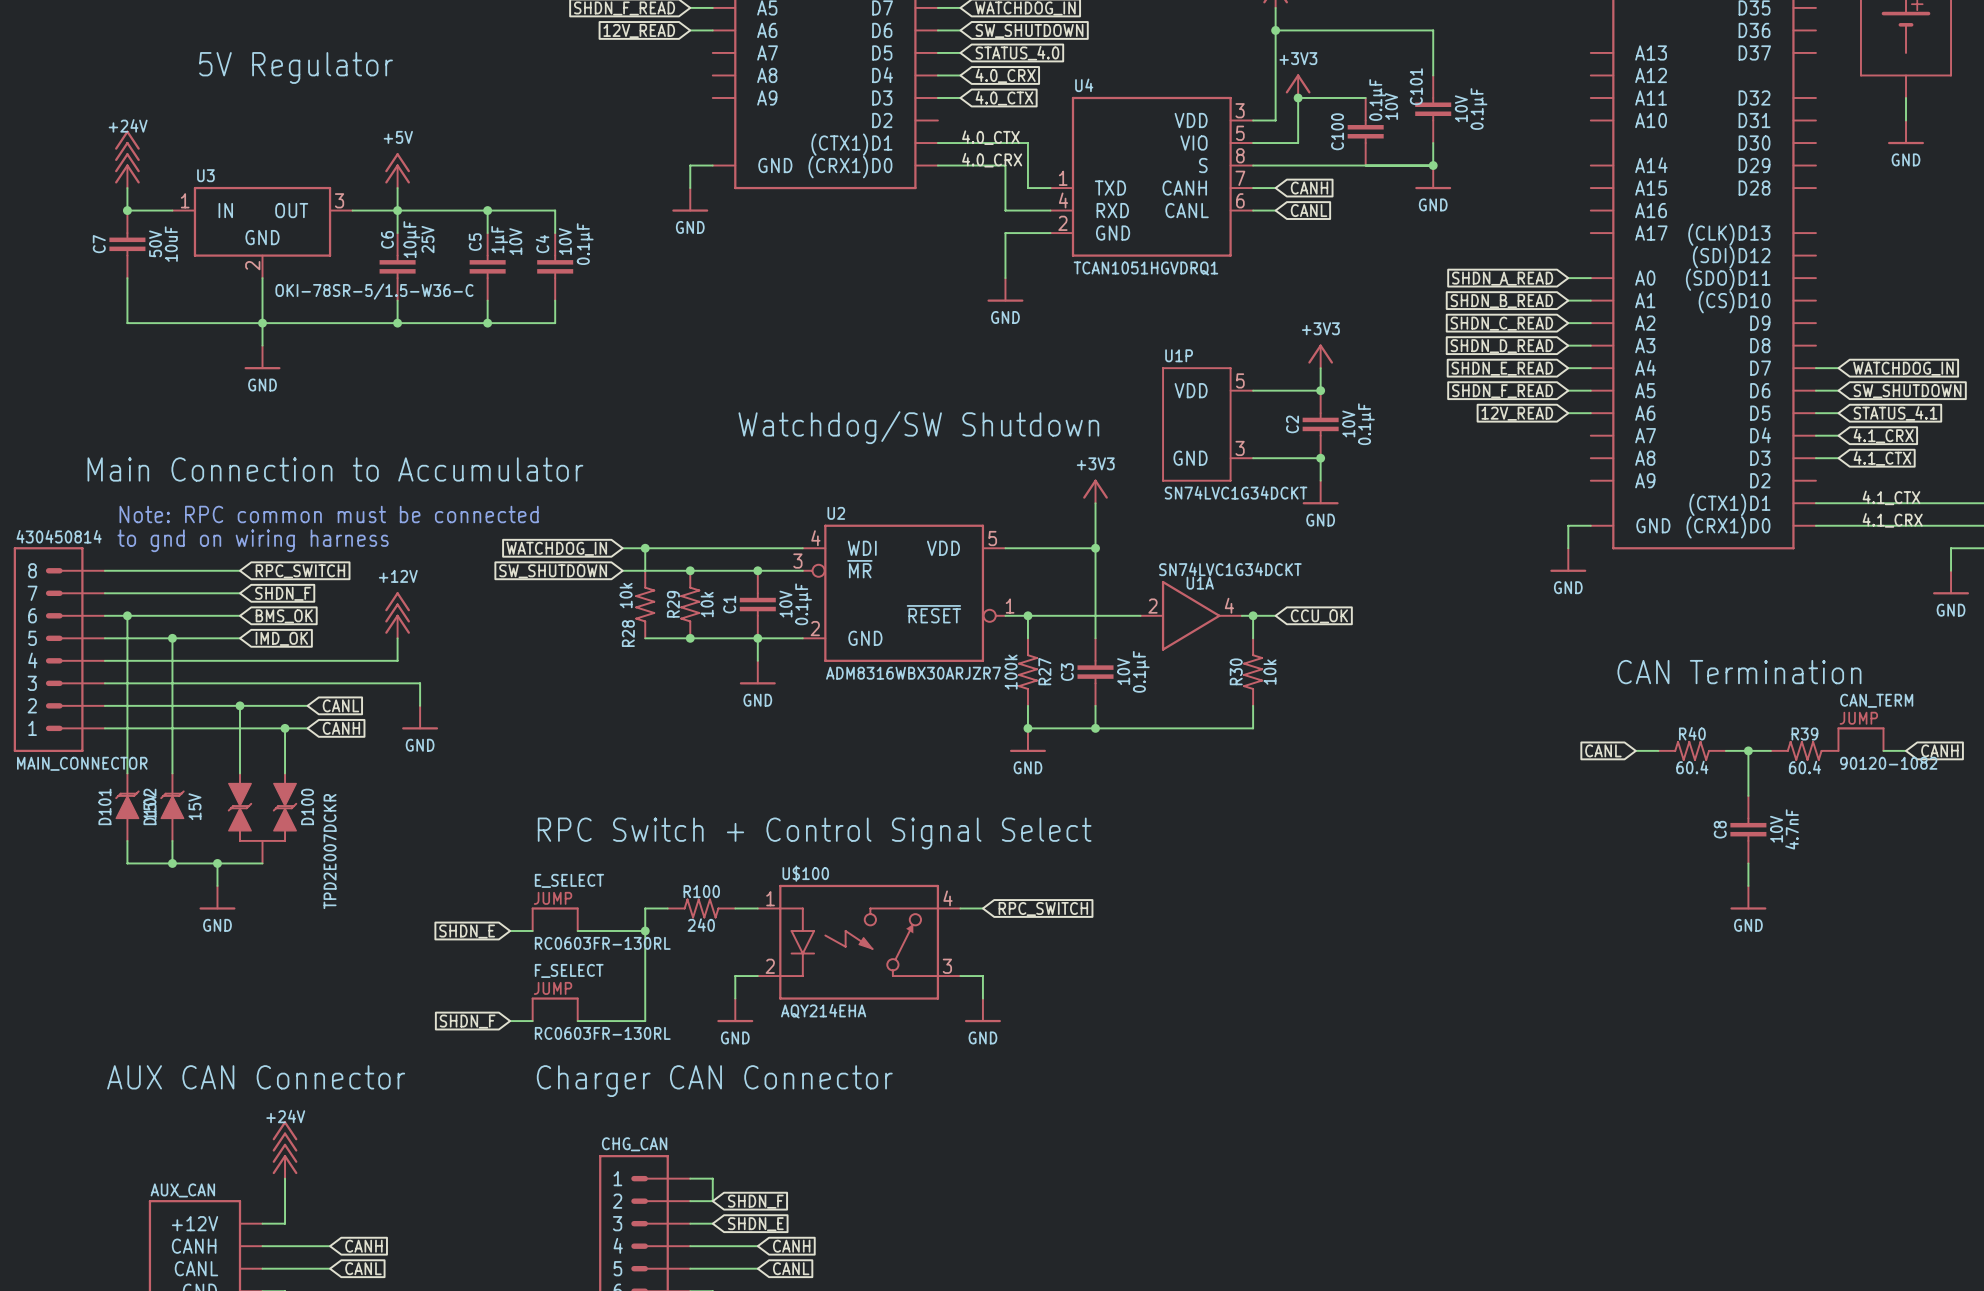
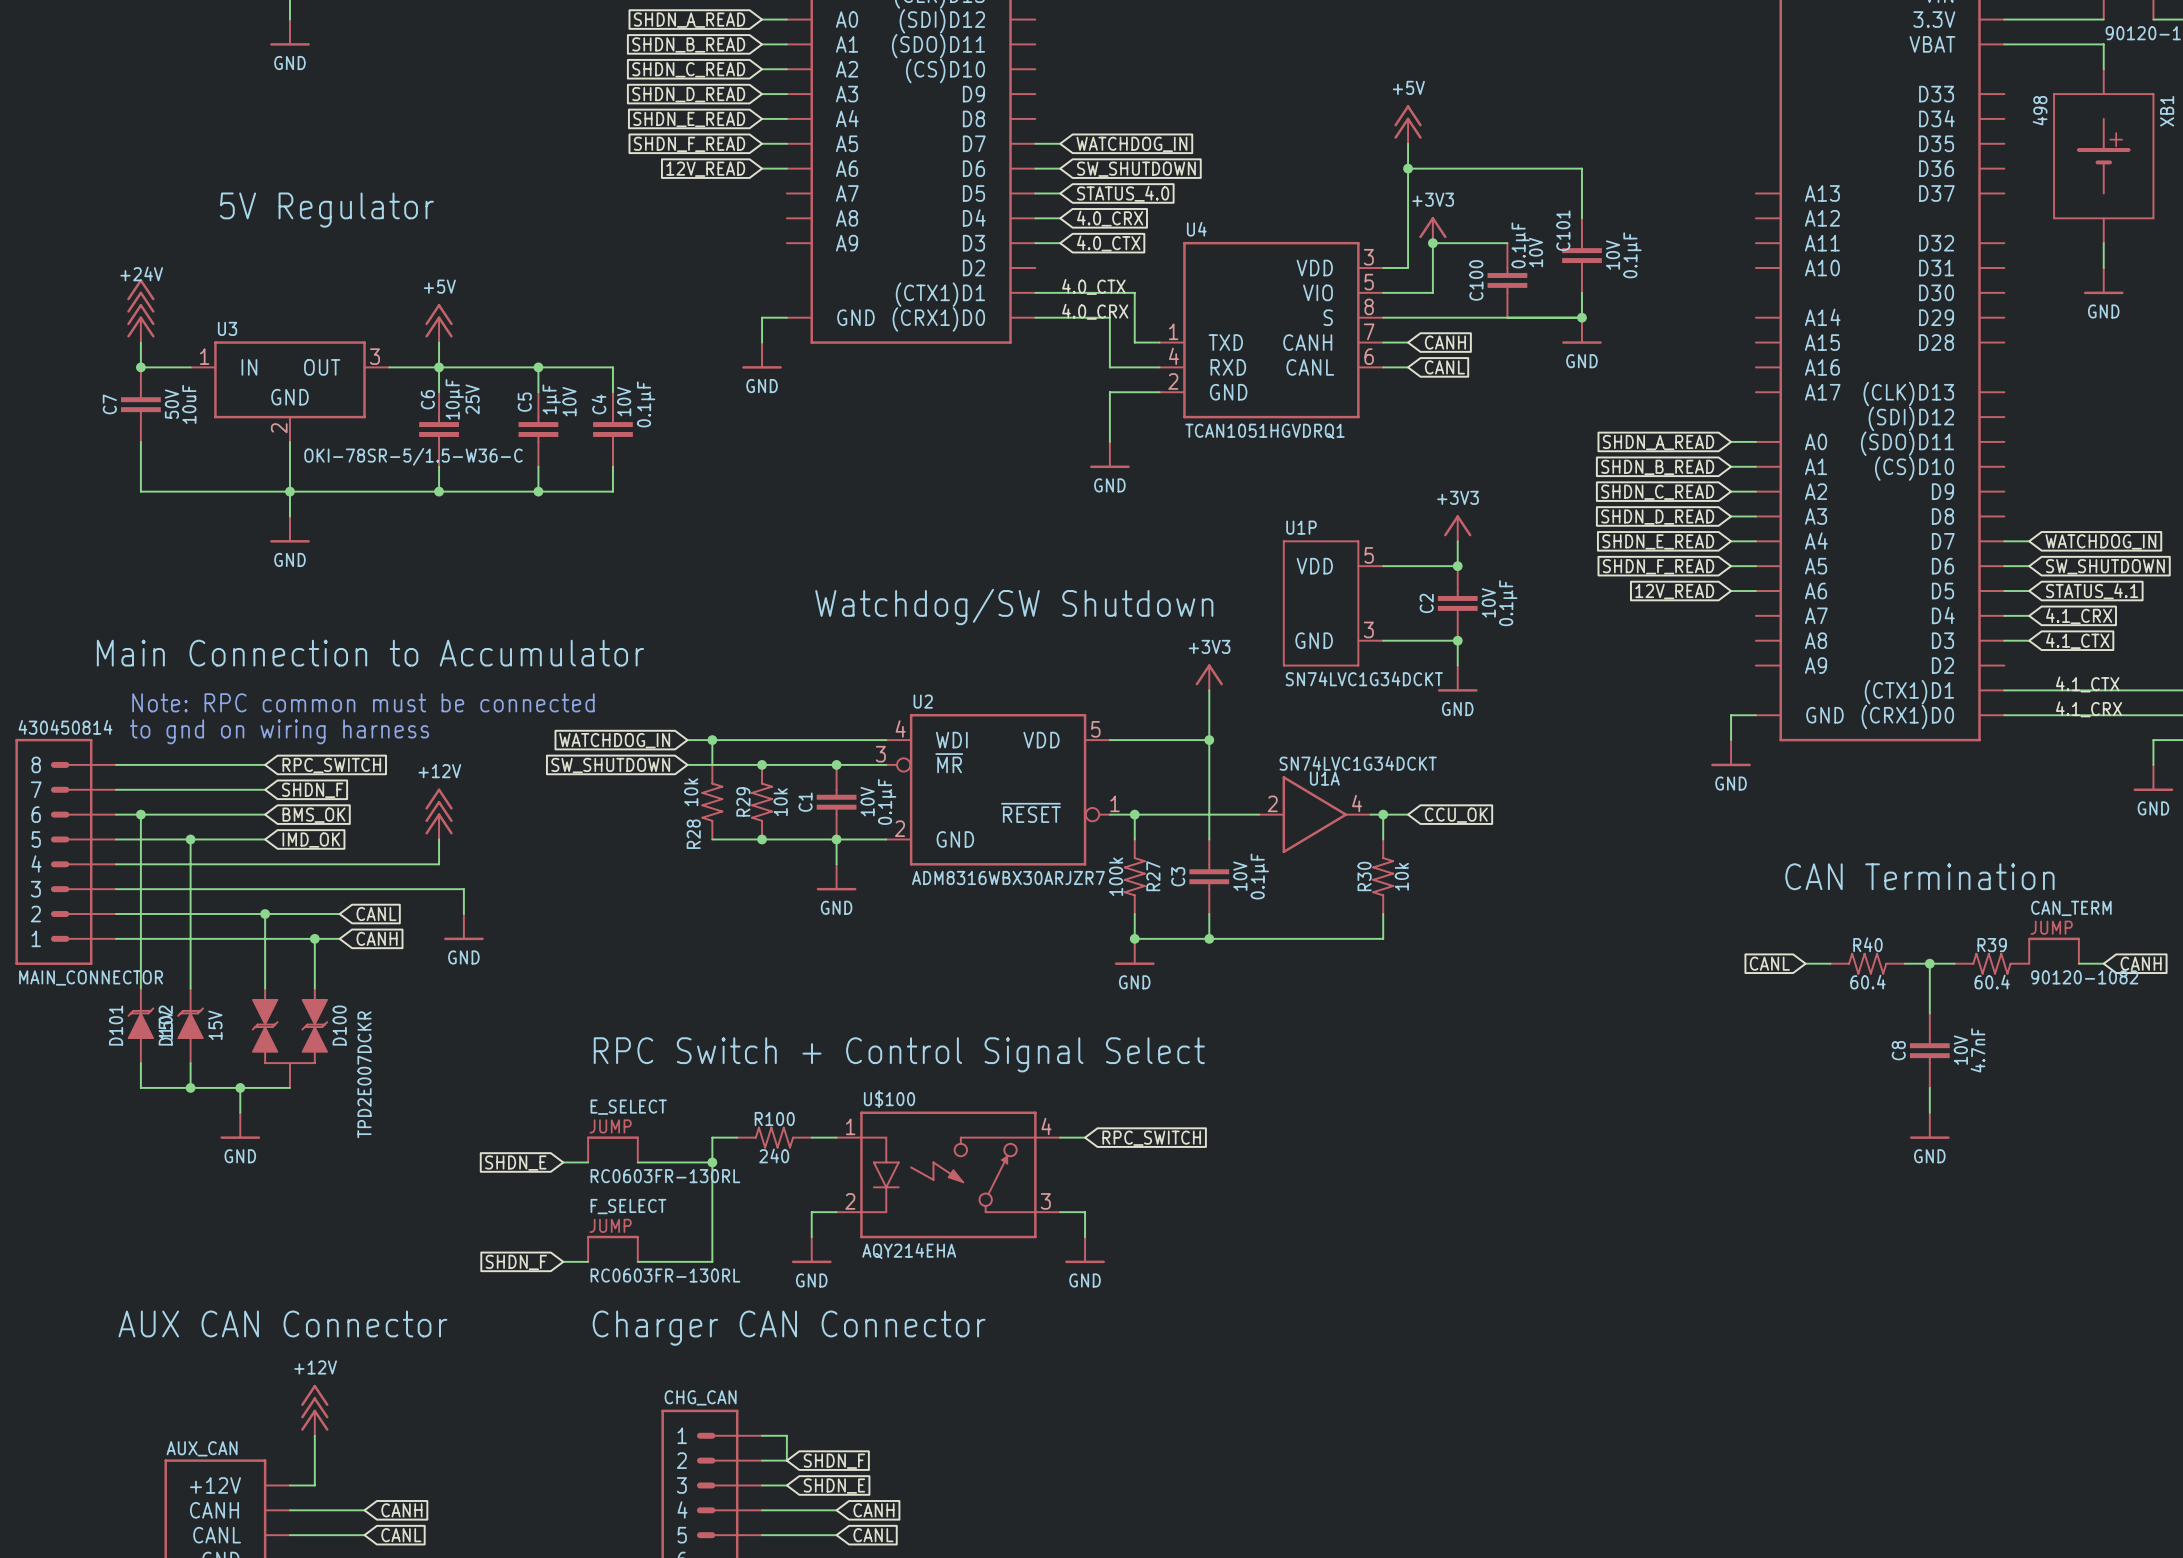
power symbol: +24V (285, 1149) -> +12V (314, 1410)

